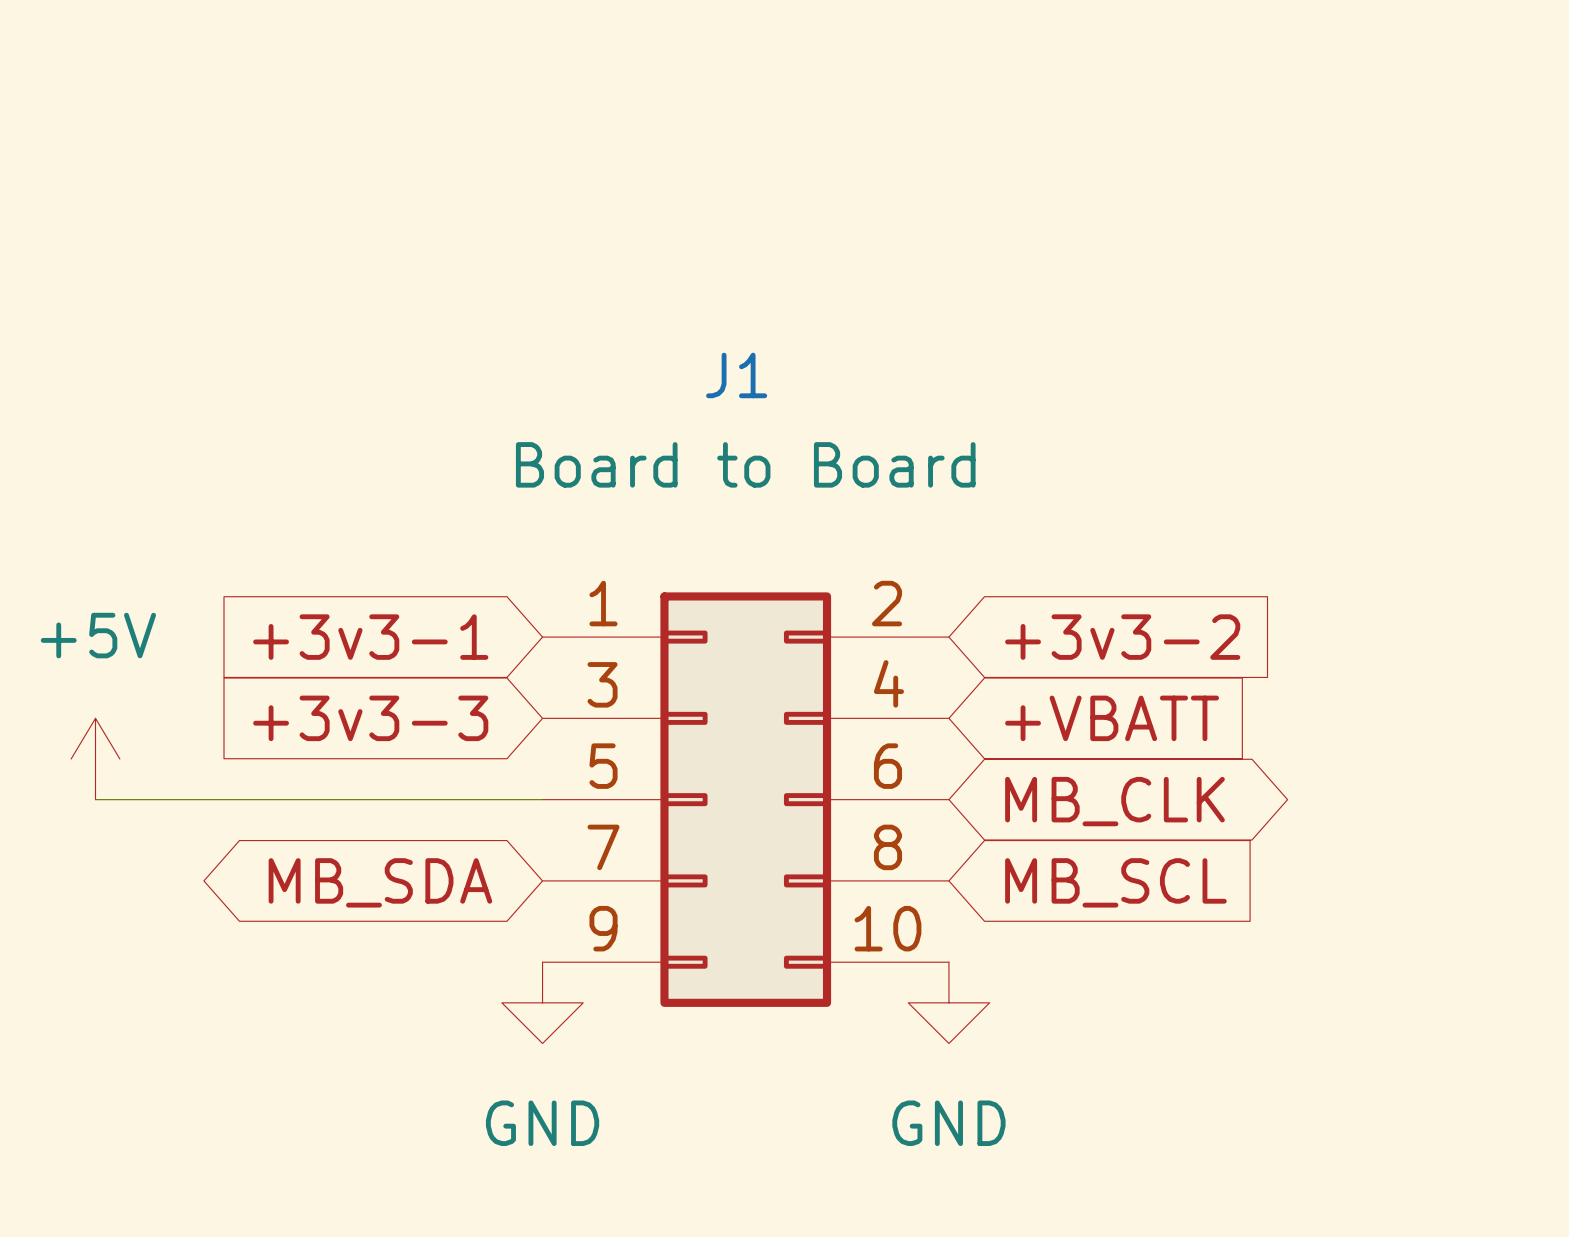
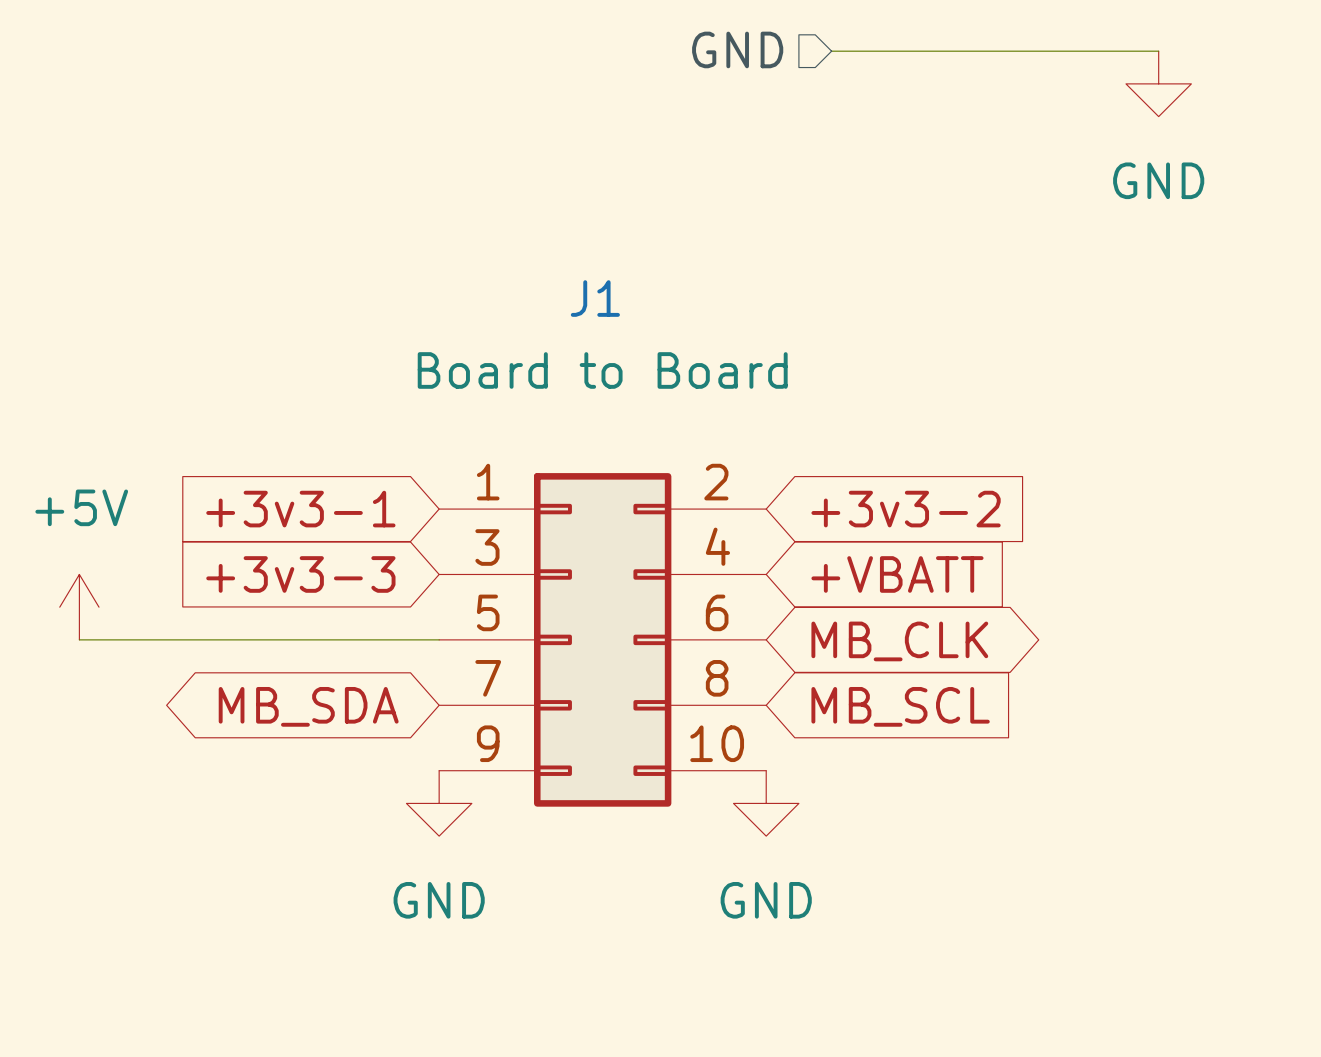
sheet pin: none -> GND (737, 49)
wire: none -> (831, 51) (1158, 51)
power symbol: none -> GND (1158, 83)

